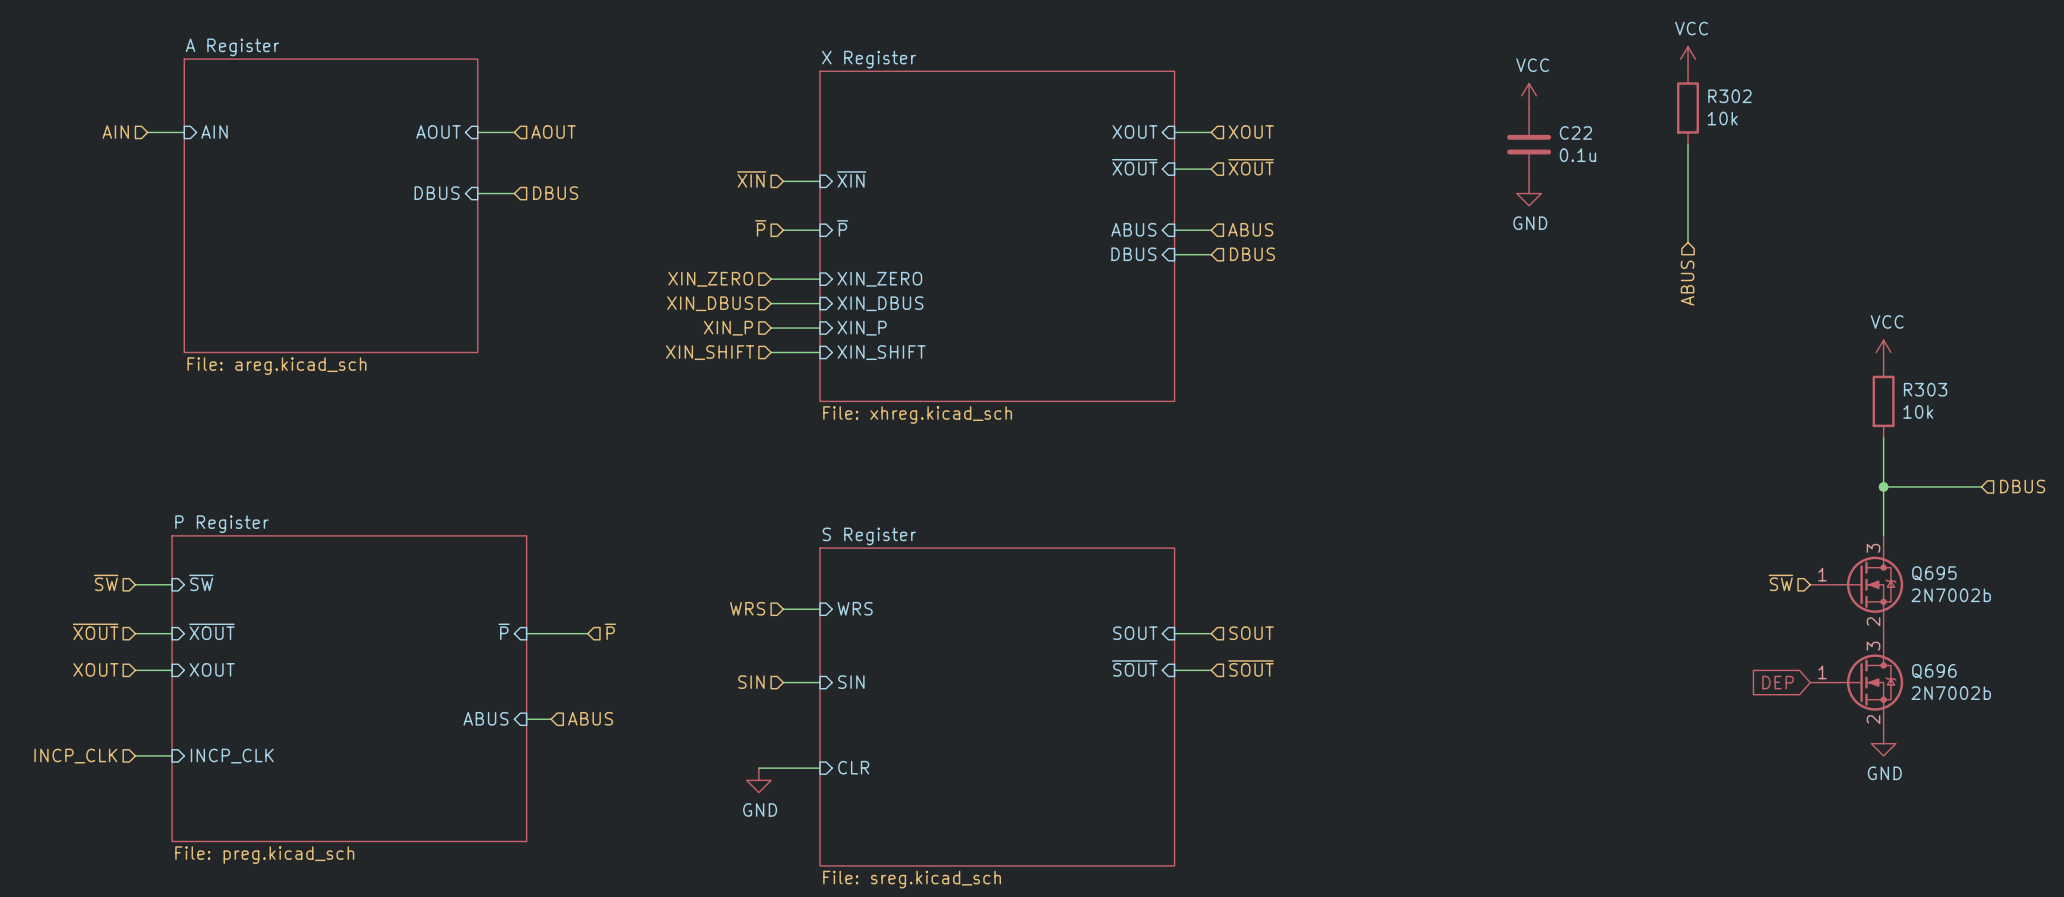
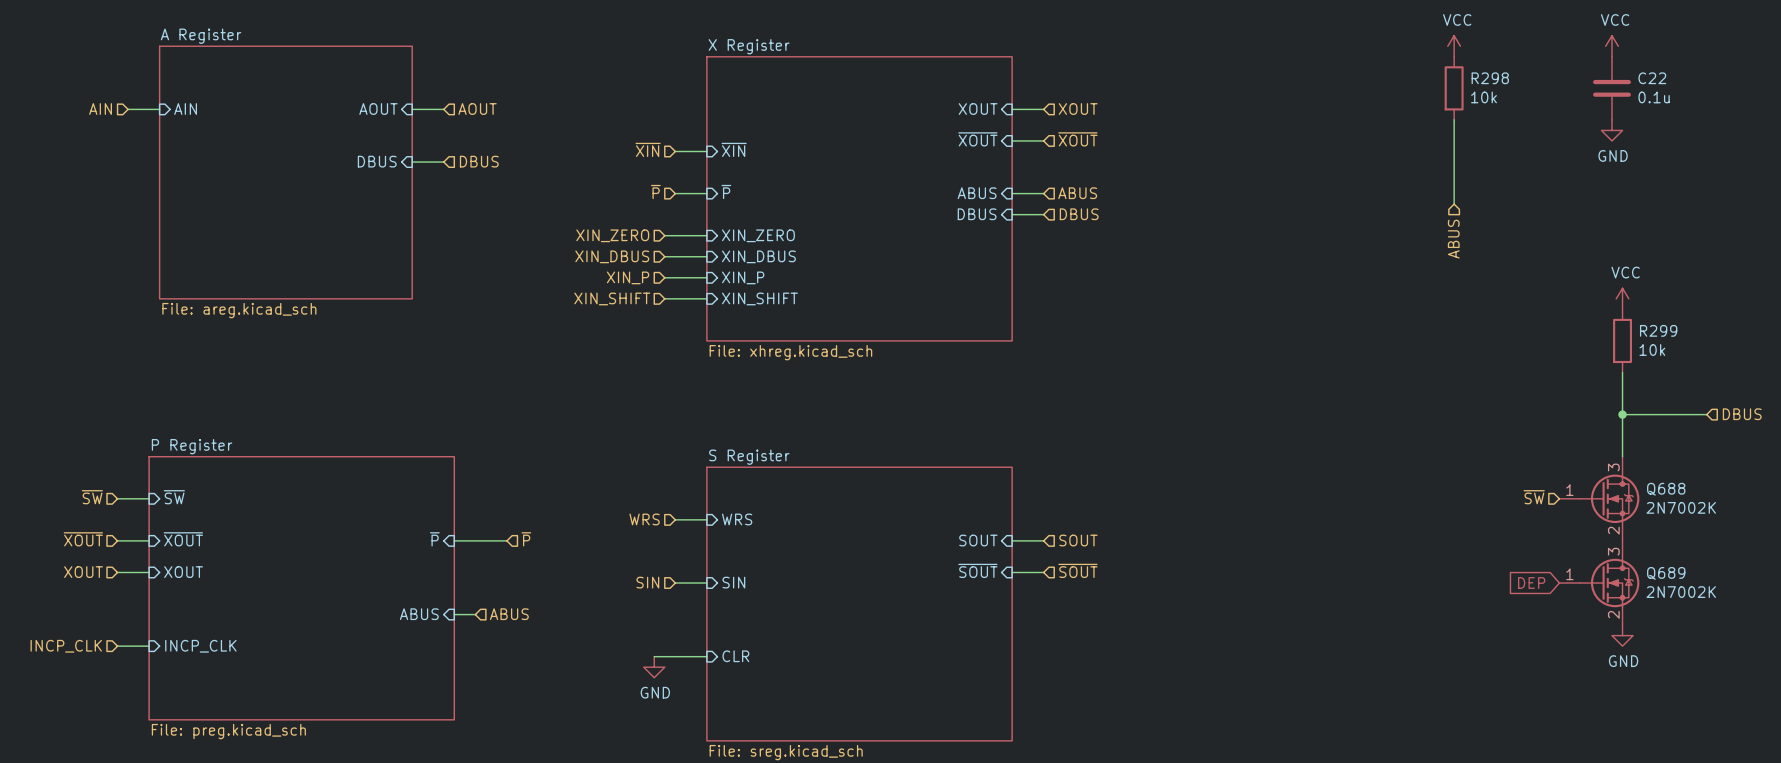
power symbol: none -> VCC (1612, 46)
power symbol: VCC (1529, 95) -> none
R302 name: R302 (1729, 96) -> R298 (1490, 78)
C22 position: (1529, 144) -> (1612, 88)
power symbol: none -> GND (1612, 130)
power symbol: GND (1529, 193) -> none
R303 name: R303 (1925, 389) -> R299 (1658, 330)
Q695 name: Q695 (1934, 573) -> Q688 (1666, 489)
Q695 value: 2N7002b (1951, 595) -> 2N7002K (1681, 507)
Q696 name: Q696 (1934, 671) -> Q689 (1666, 573)
Q696 value: 2N7002b (1951, 693) -> 2N7002K (1681, 592)

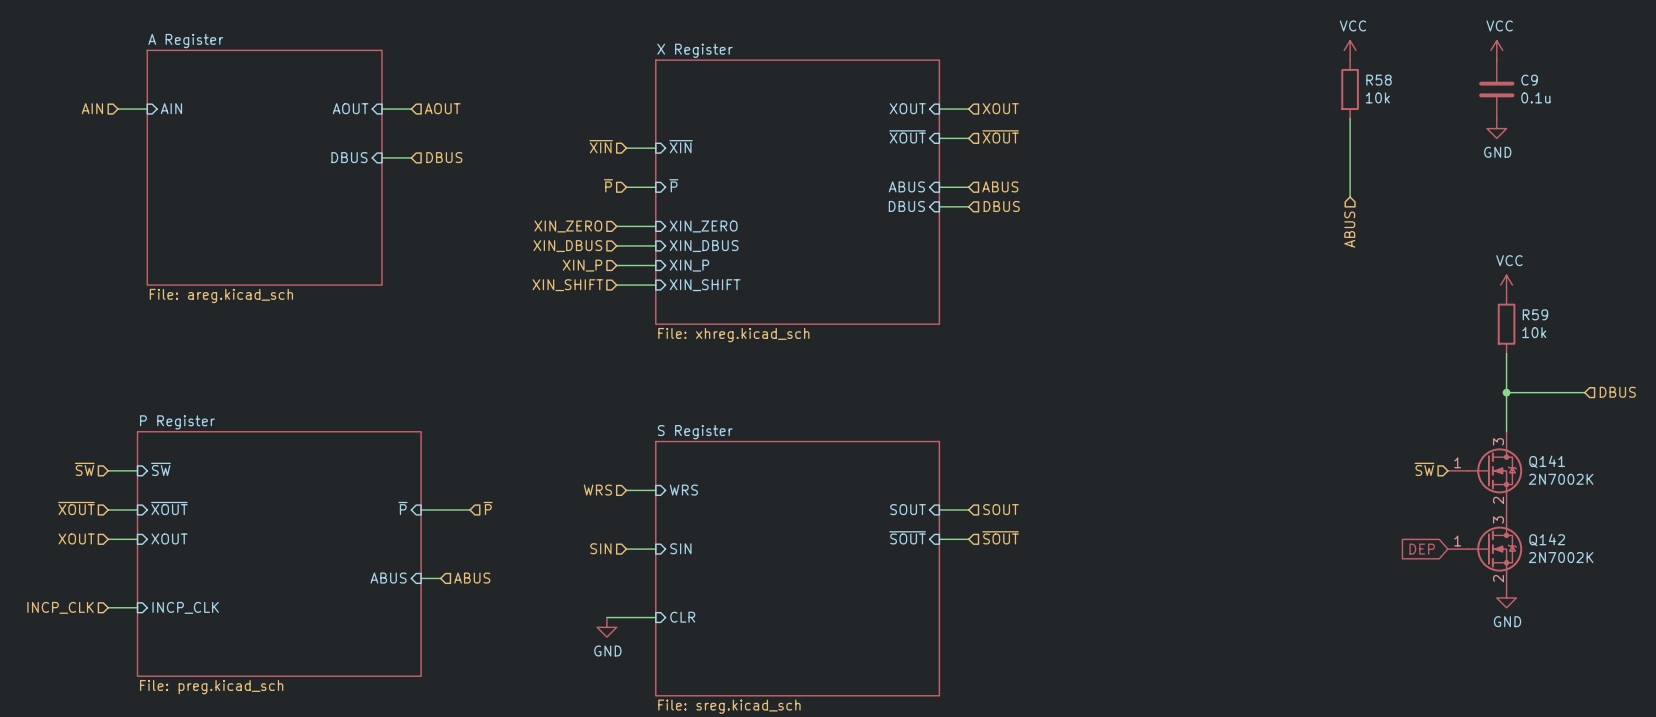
R298 name: R298 (1490, 78) -> R58 (1379, 80)
C22 name: C22 (1652, 78) -> C9 (1529, 80)
R299 name: R299 (1658, 330) -> R59 (1535, 314)
Q688 name: Q688 (1666, 489) -> Q141 (1547, 461)
Q689 name: Q689 (1666, 573) -> Q142 (1547, 539)

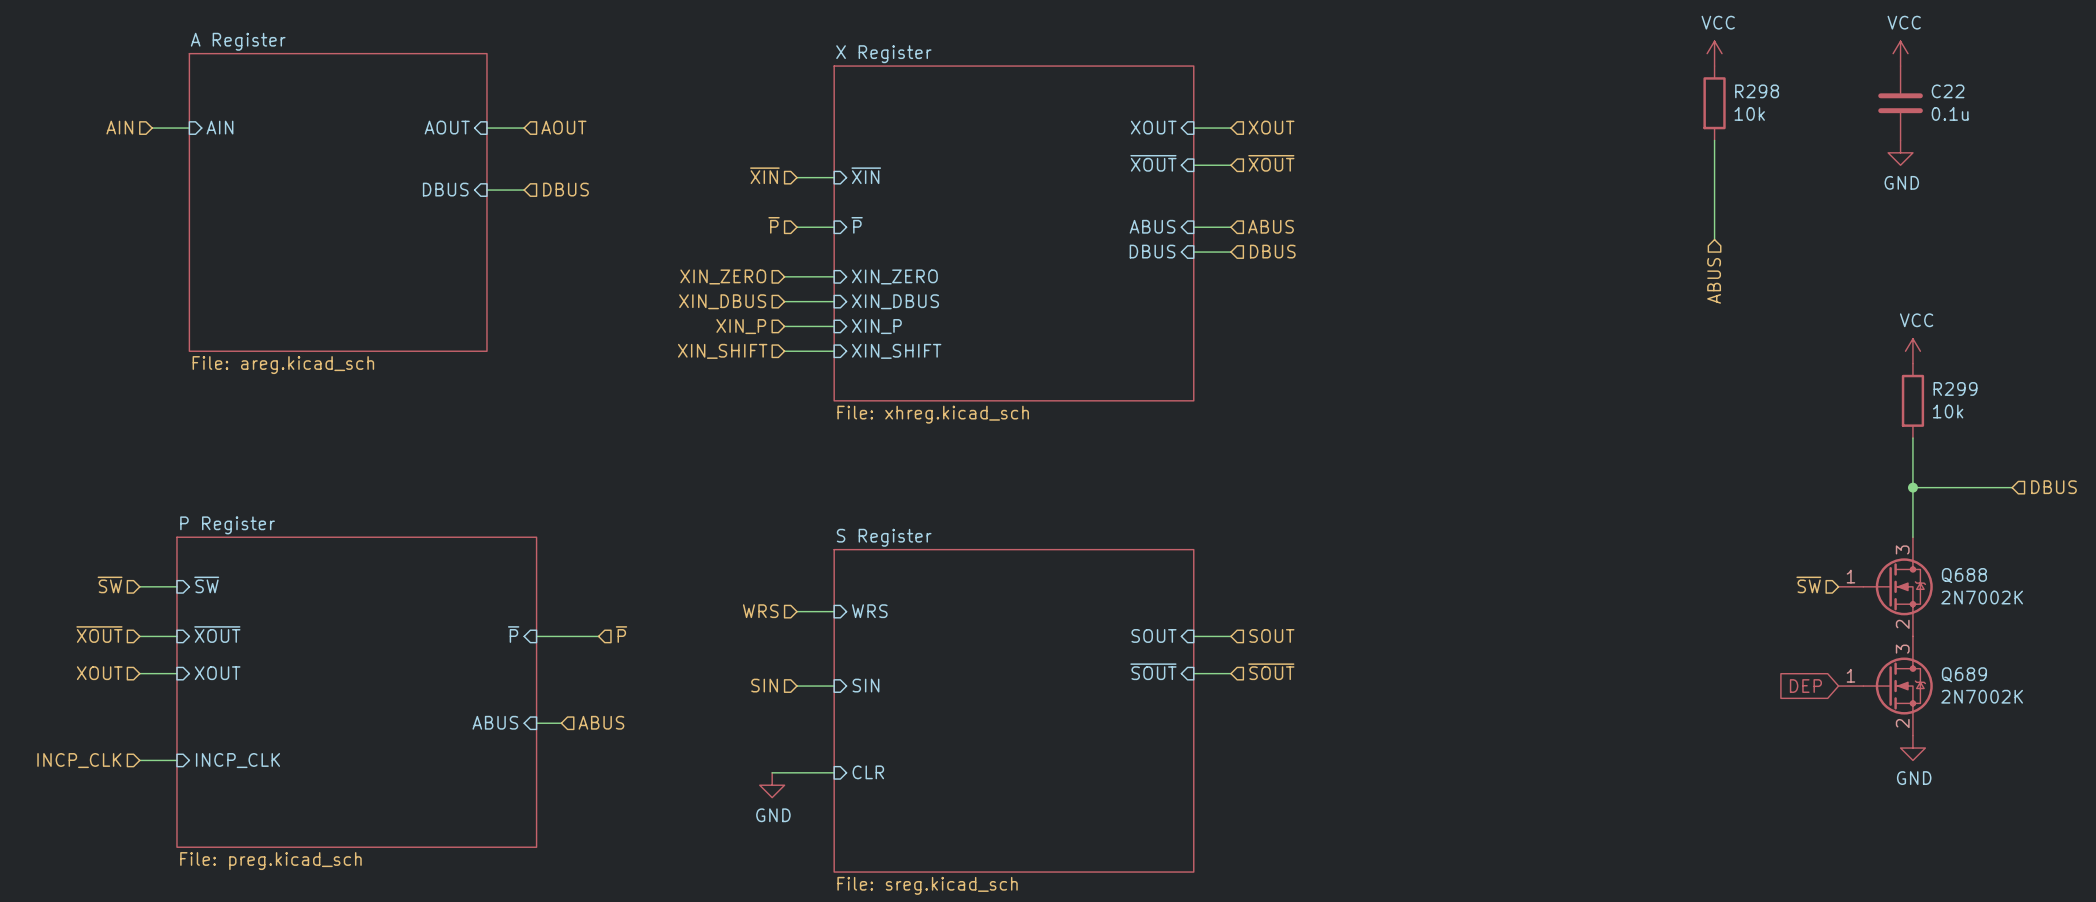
R58 name: R58 (1379, 80) -> R298 (1757, 91)
C9 name: C9 (1529, 80) -> C22 (1948, 91)
R59 name: R59 (1535, 314) -> R299 (1955, 388)
Q141 name: Q141 (1547, 461) -> Q688 (1964, 575)
Q142 name: Q142 (1547, 539) -> Q689 (1964, 674)

